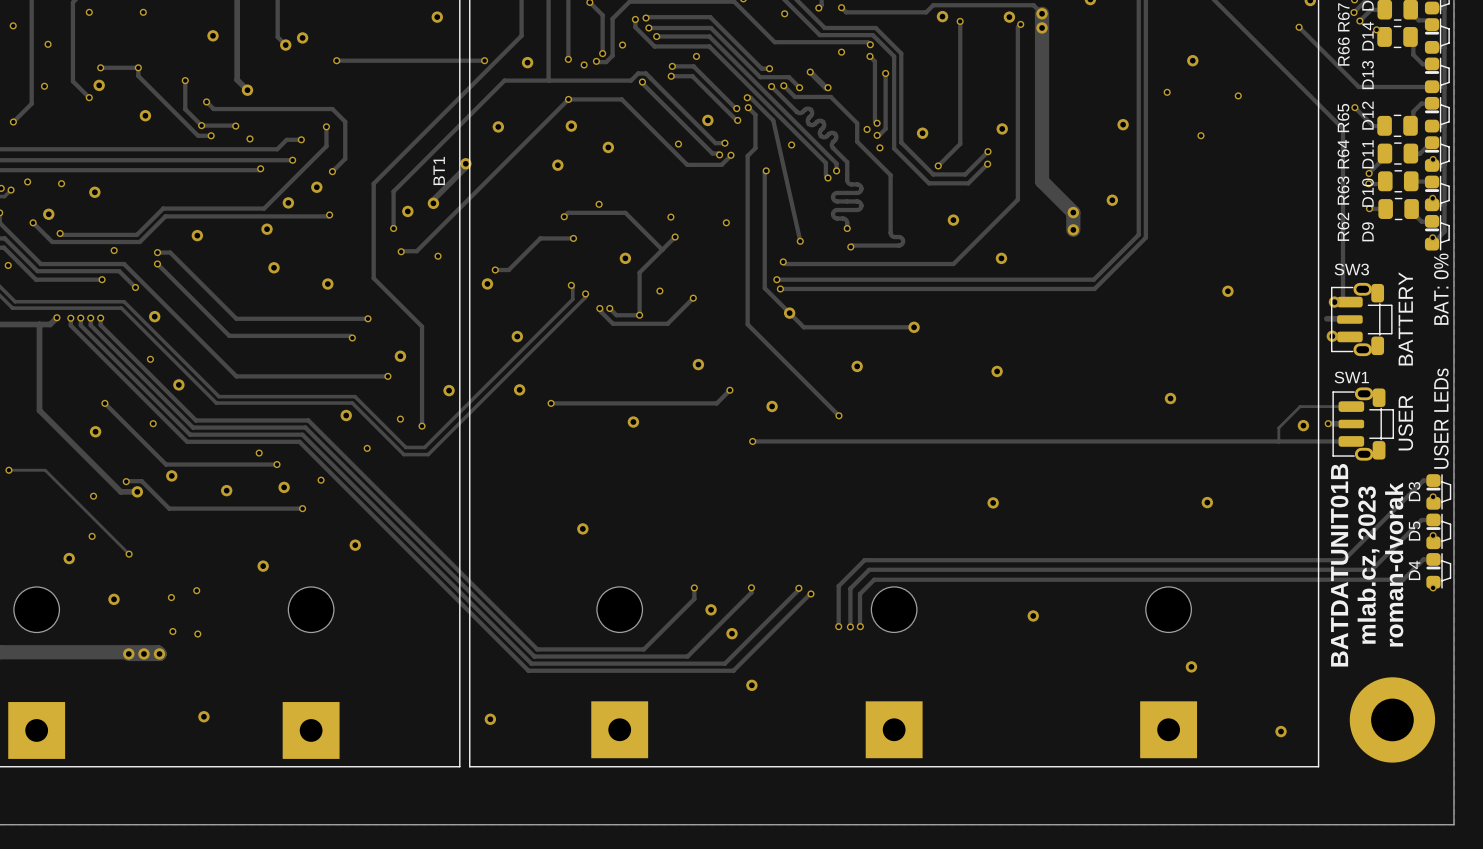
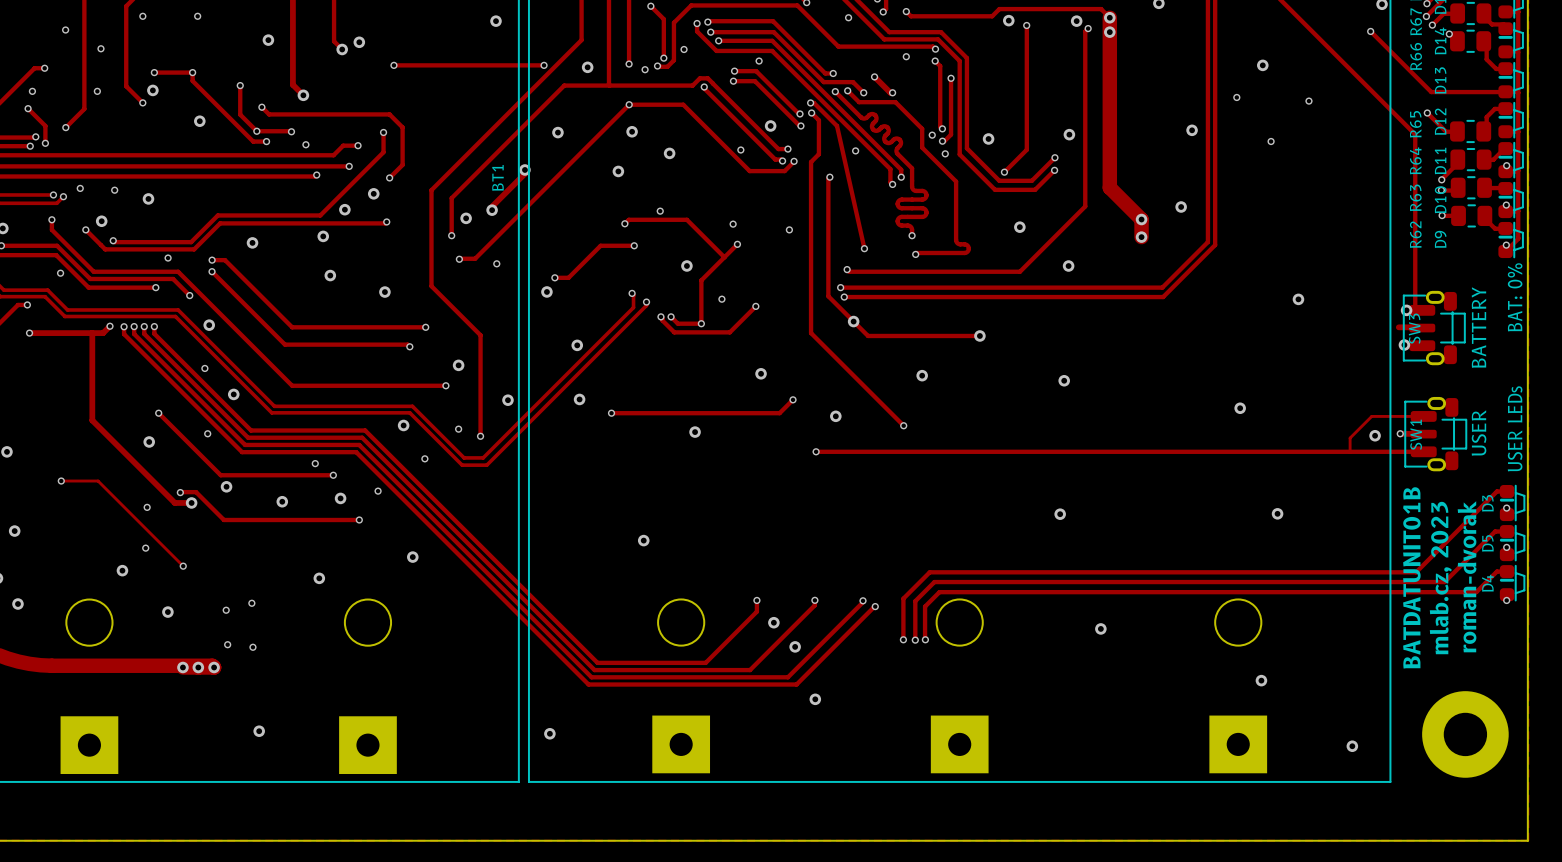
SW3 name rotation: 0° (1351, 269) -> 90° counterclockwise (1414, 328)
SW3 name position: SW3 (1351, 269) -> SW3 (1414, 328)
SW1 name rotation: 0° (1351, 377) -> 90° counterclockwise (1416, 434)
SW1 name position: SW1 (1351, 377) -> SW1 (1416, 434)

